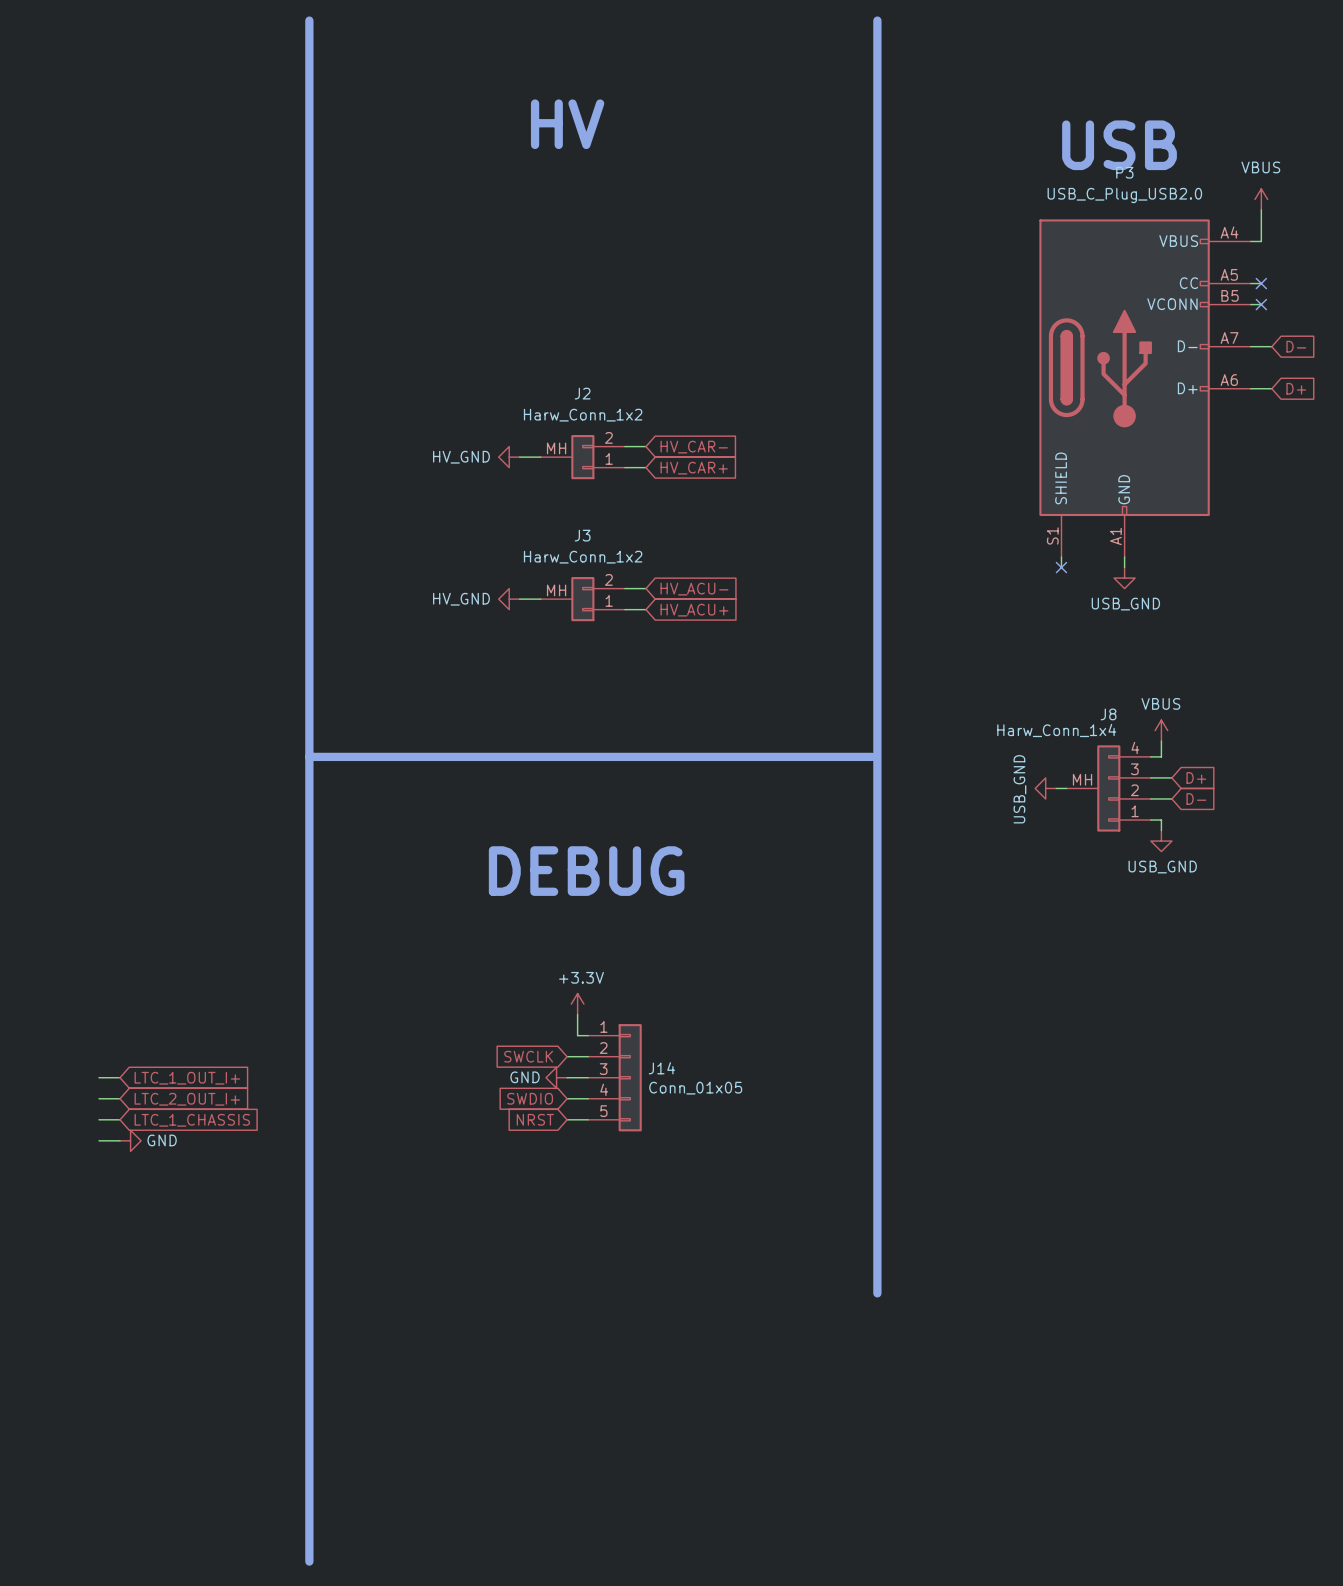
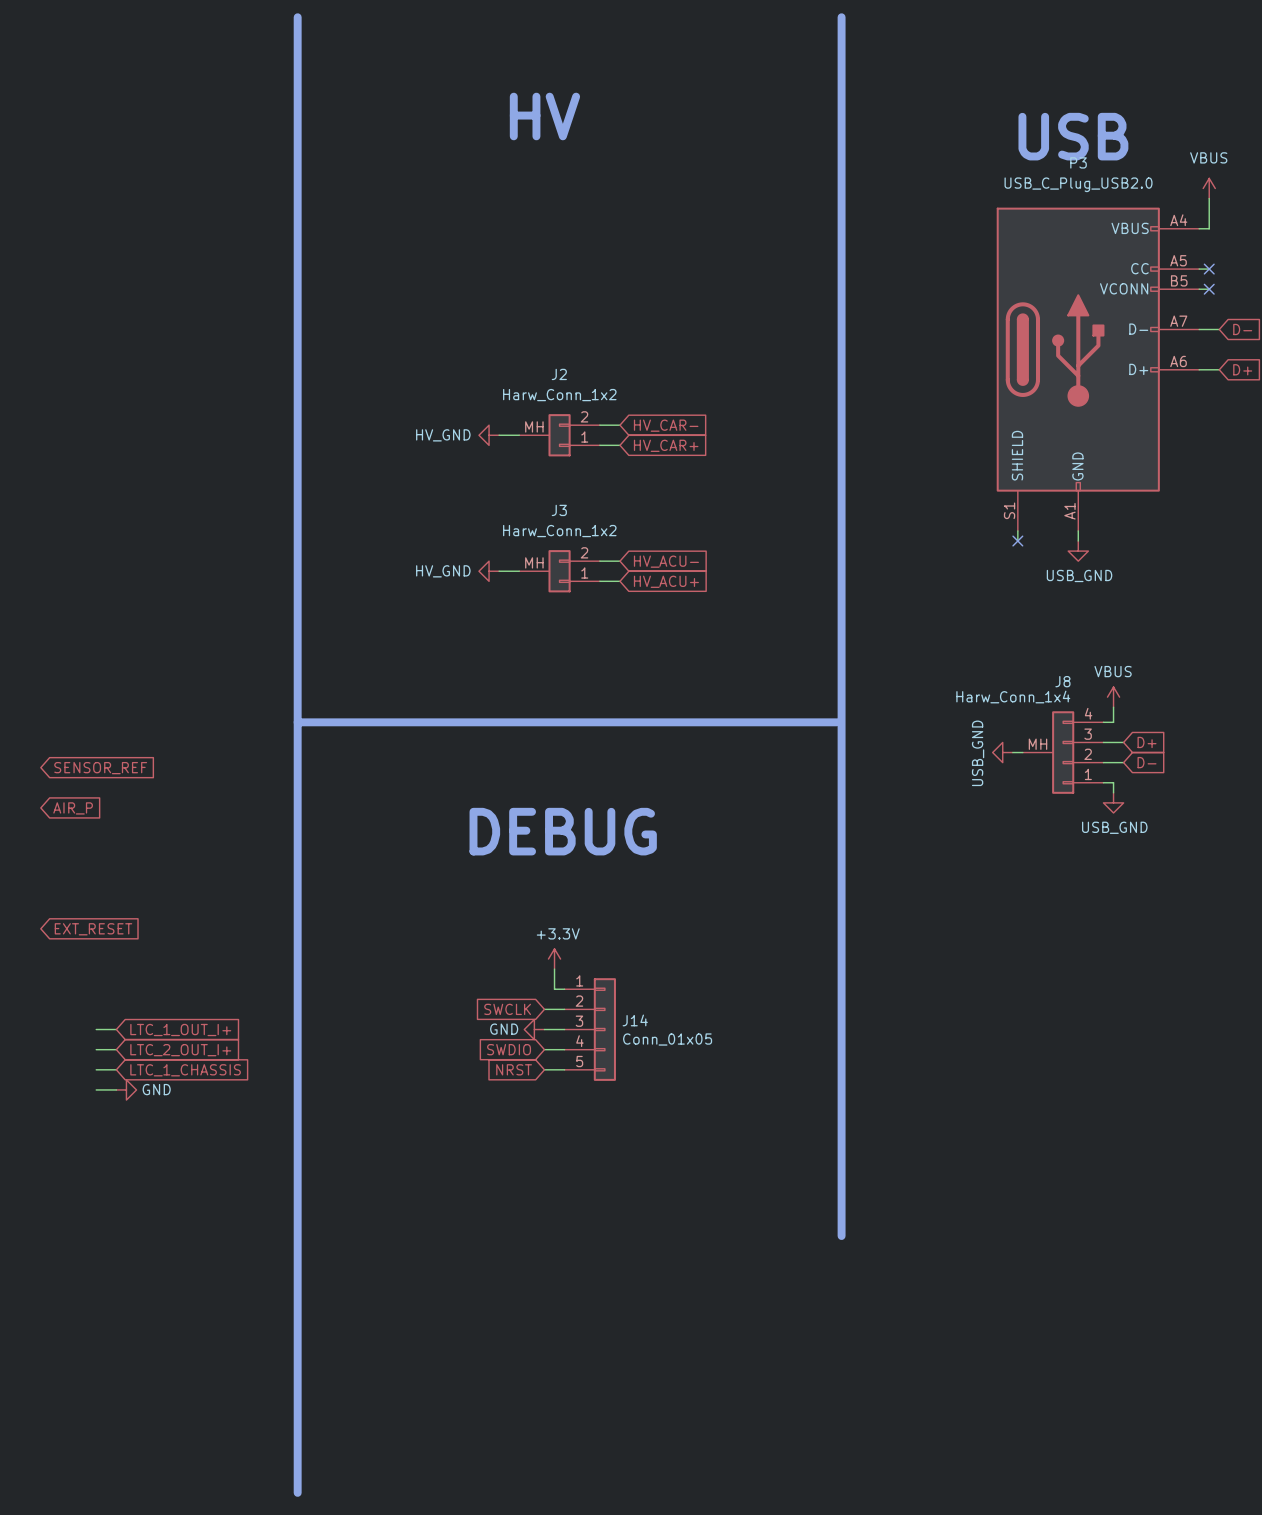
global label: none -> SENSOR_REF (100, 768)
global label: none -> AIR_P (73, 808)
global label: none -> EXT_RESET (93, 929)

